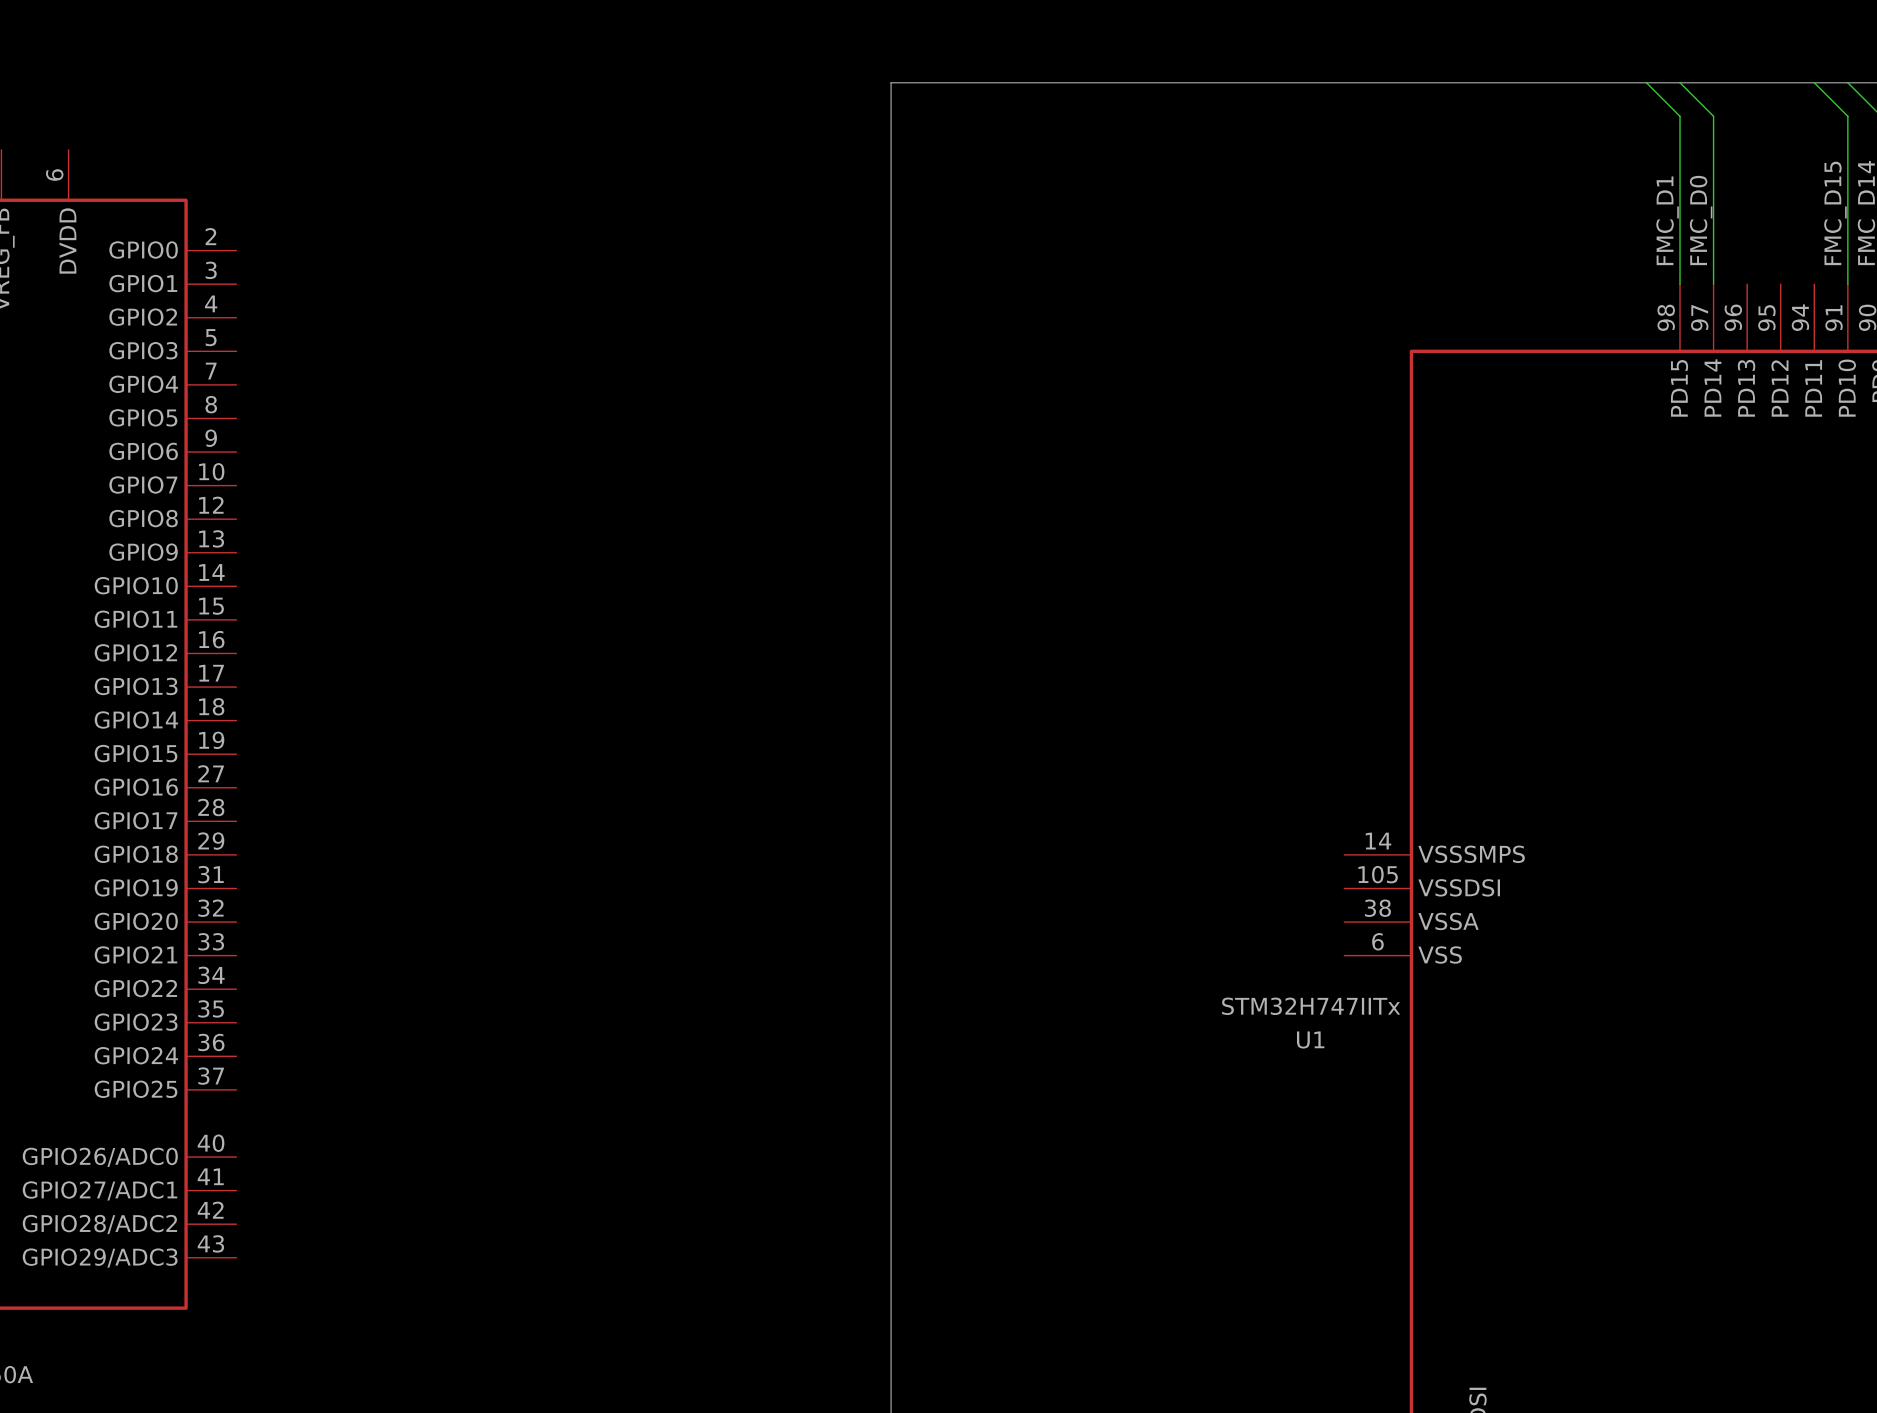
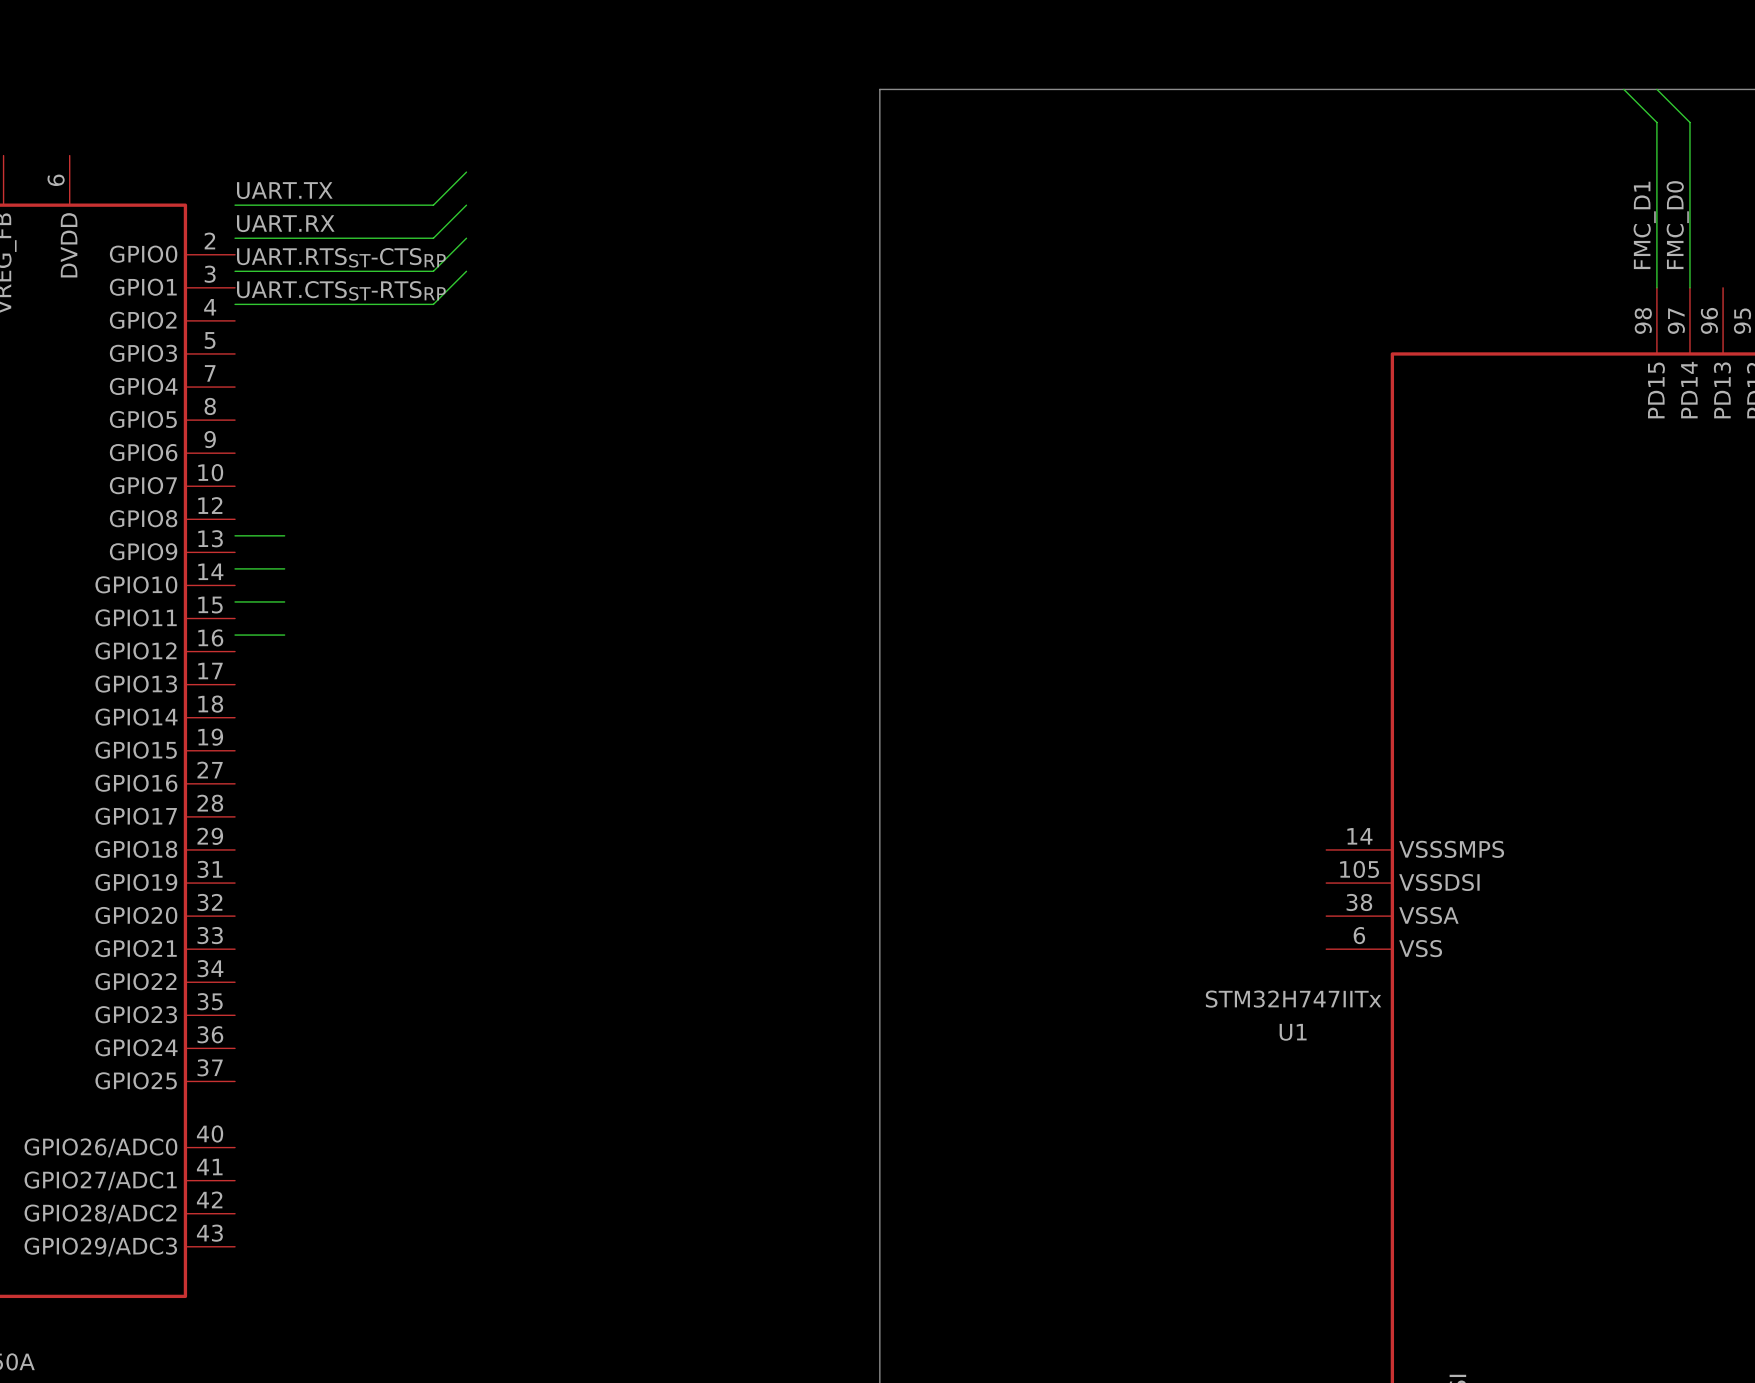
wire: none -> (466, 172) (433, 205) (235, 205)
label: none -> UART.TX (284, 190)
wire: none -> (466, 205) (433, 238) (235, 238)
label: none -> UART.RX (285, 223)
wire: none -> (466, 238) (433, 271) (235, 271)
label: none -> UART.RTSST-CTSRP (341, 257)
wire: none -> (466, 271) (433, 304) (235, 304)
label: none -> UART.CTSST-RTSRP (341, 290)
wire: none -> (235, 535) (284, 535)
wire: none -> (235, 568) (284, 568)
wire: none -> (235, 601) (284, 601)
wire: none -> (235, 635) (284, 635)

